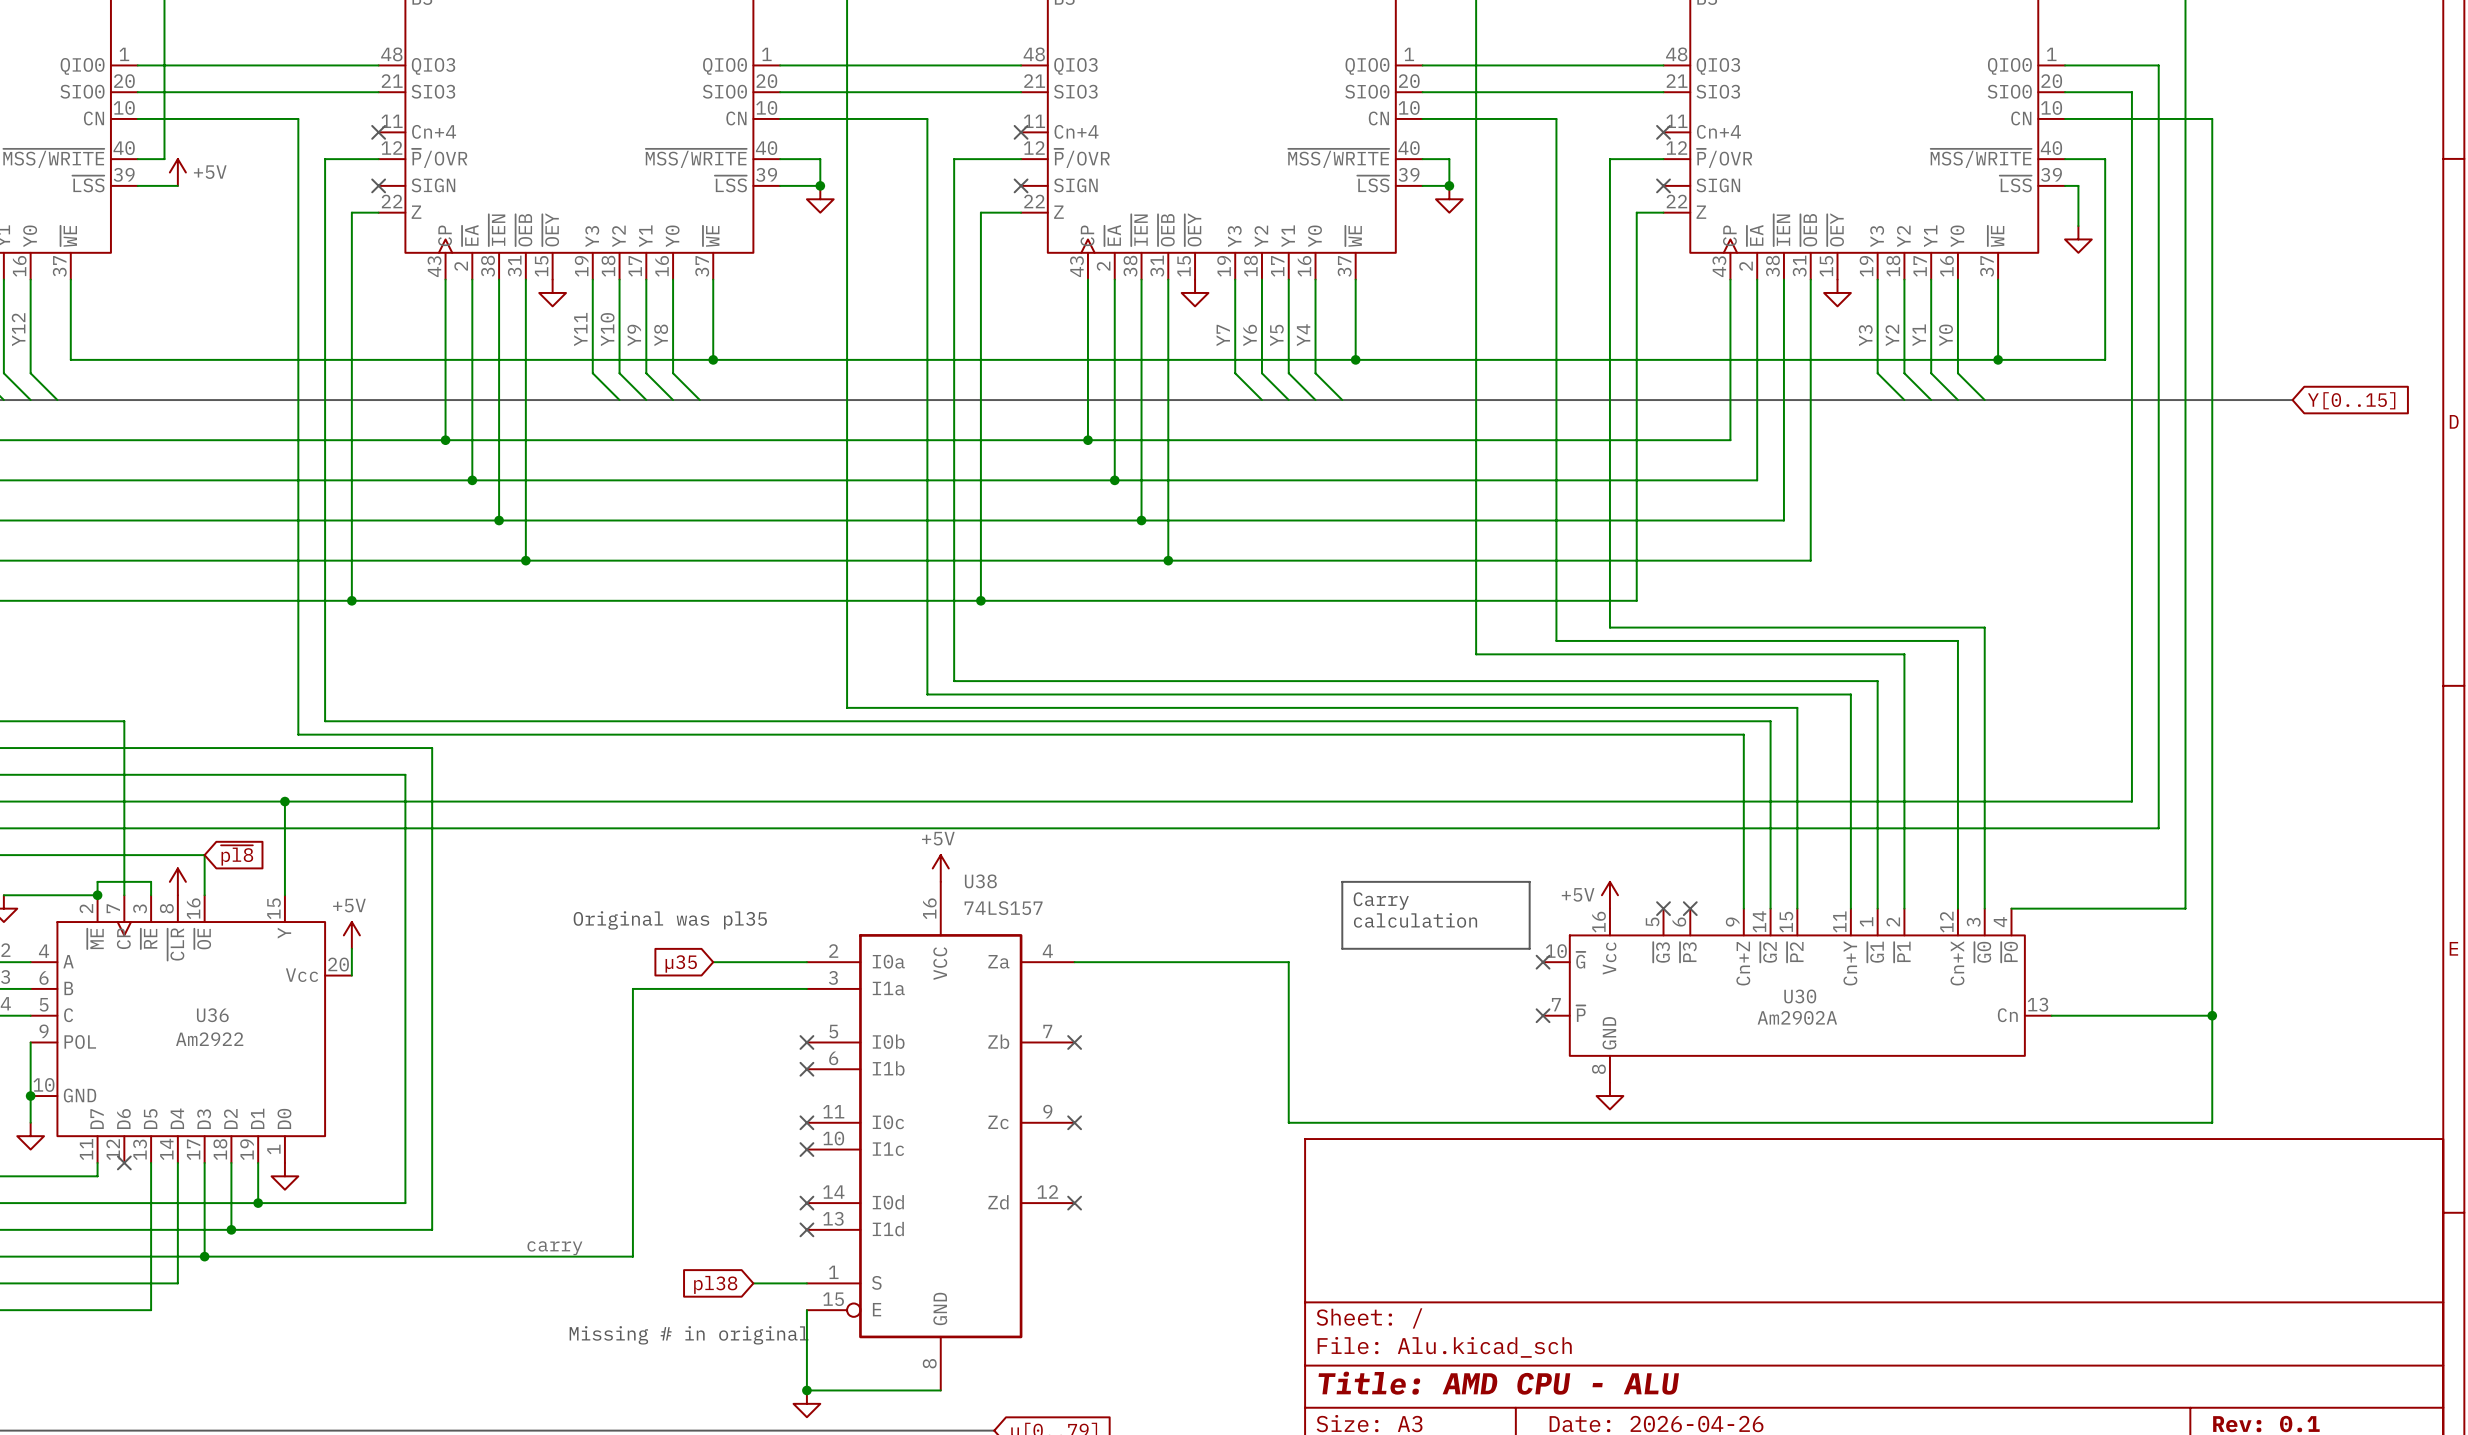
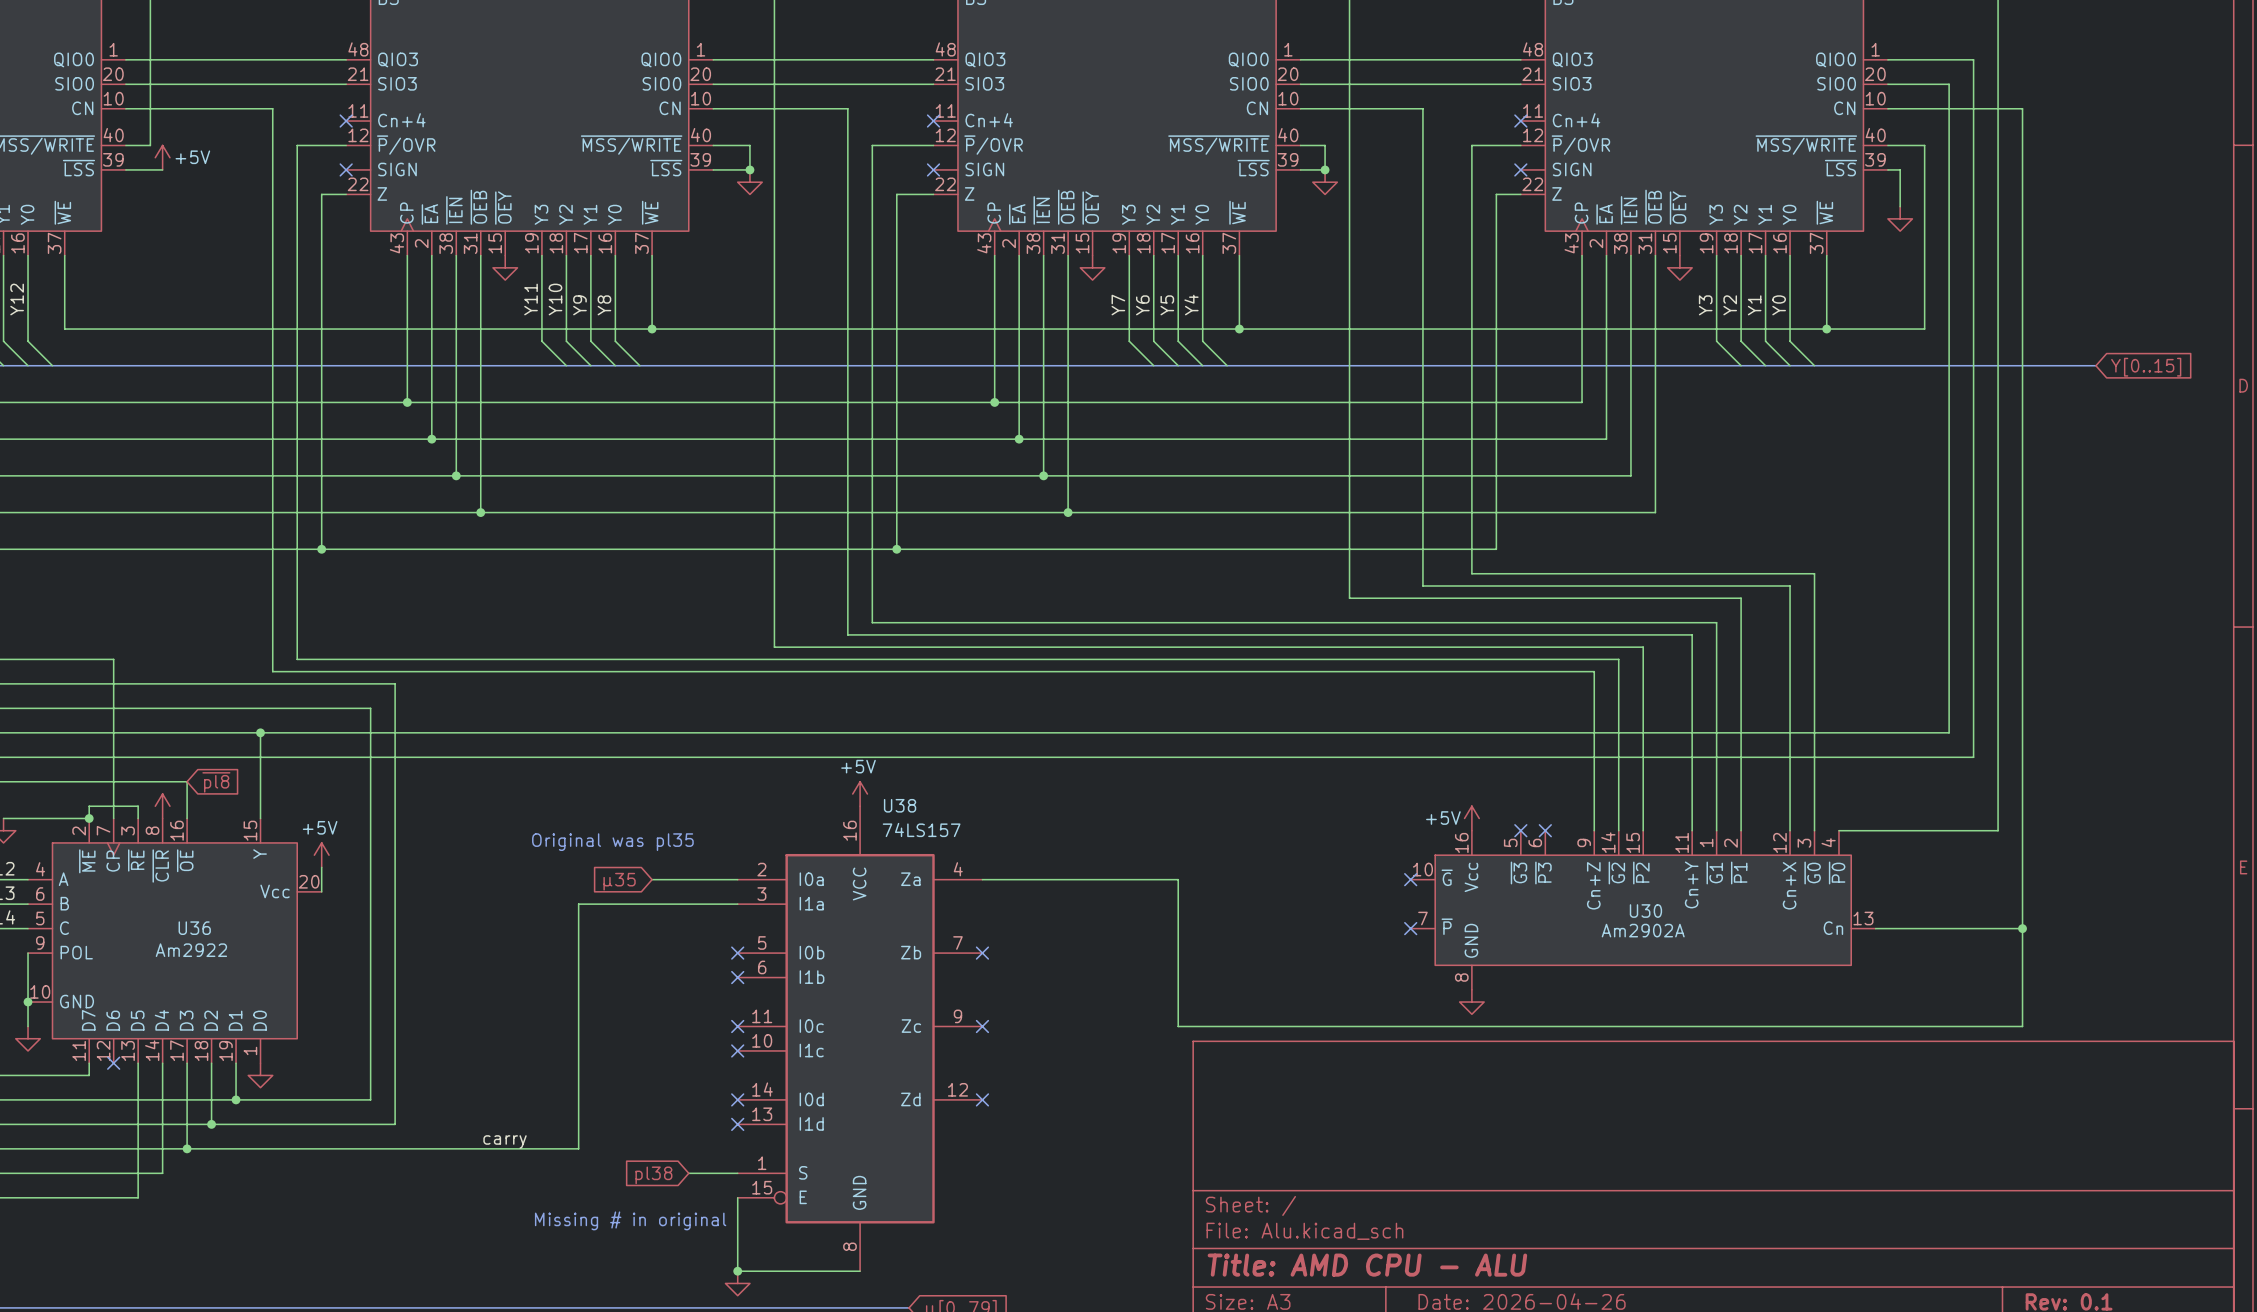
line: (1342, 881) (1529, 881) (1529, 948) (1342, 948) (1342, 881) -> none
text: Carry (1381, 901) -> none
text: calculation (1415, 920) -> none

